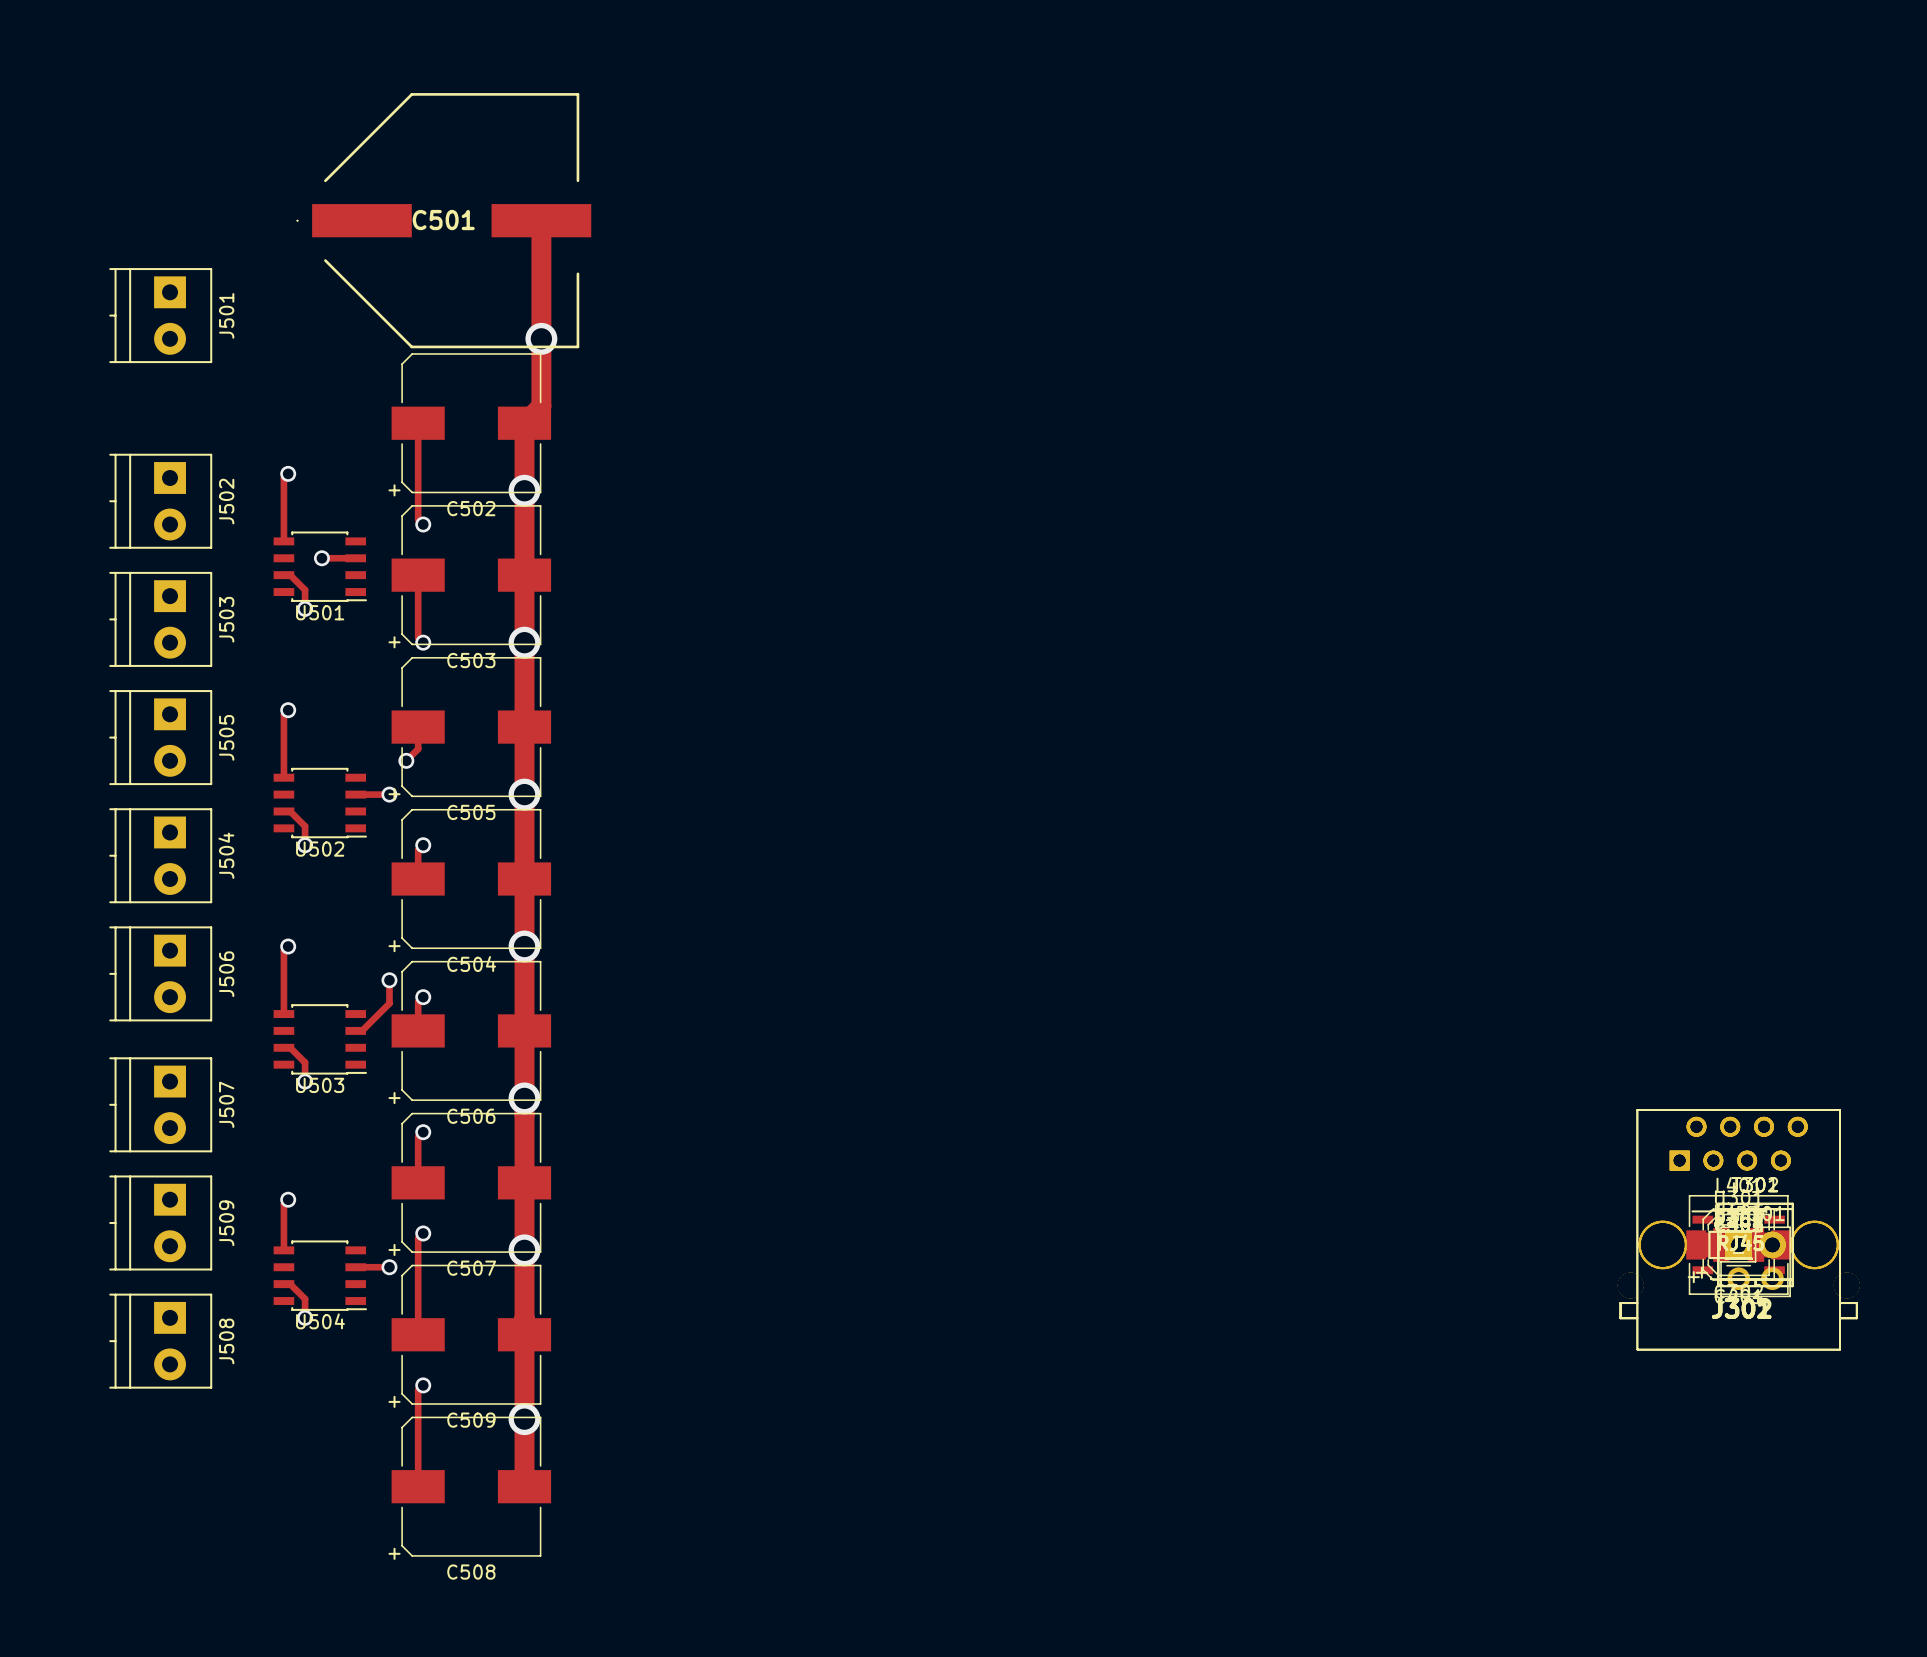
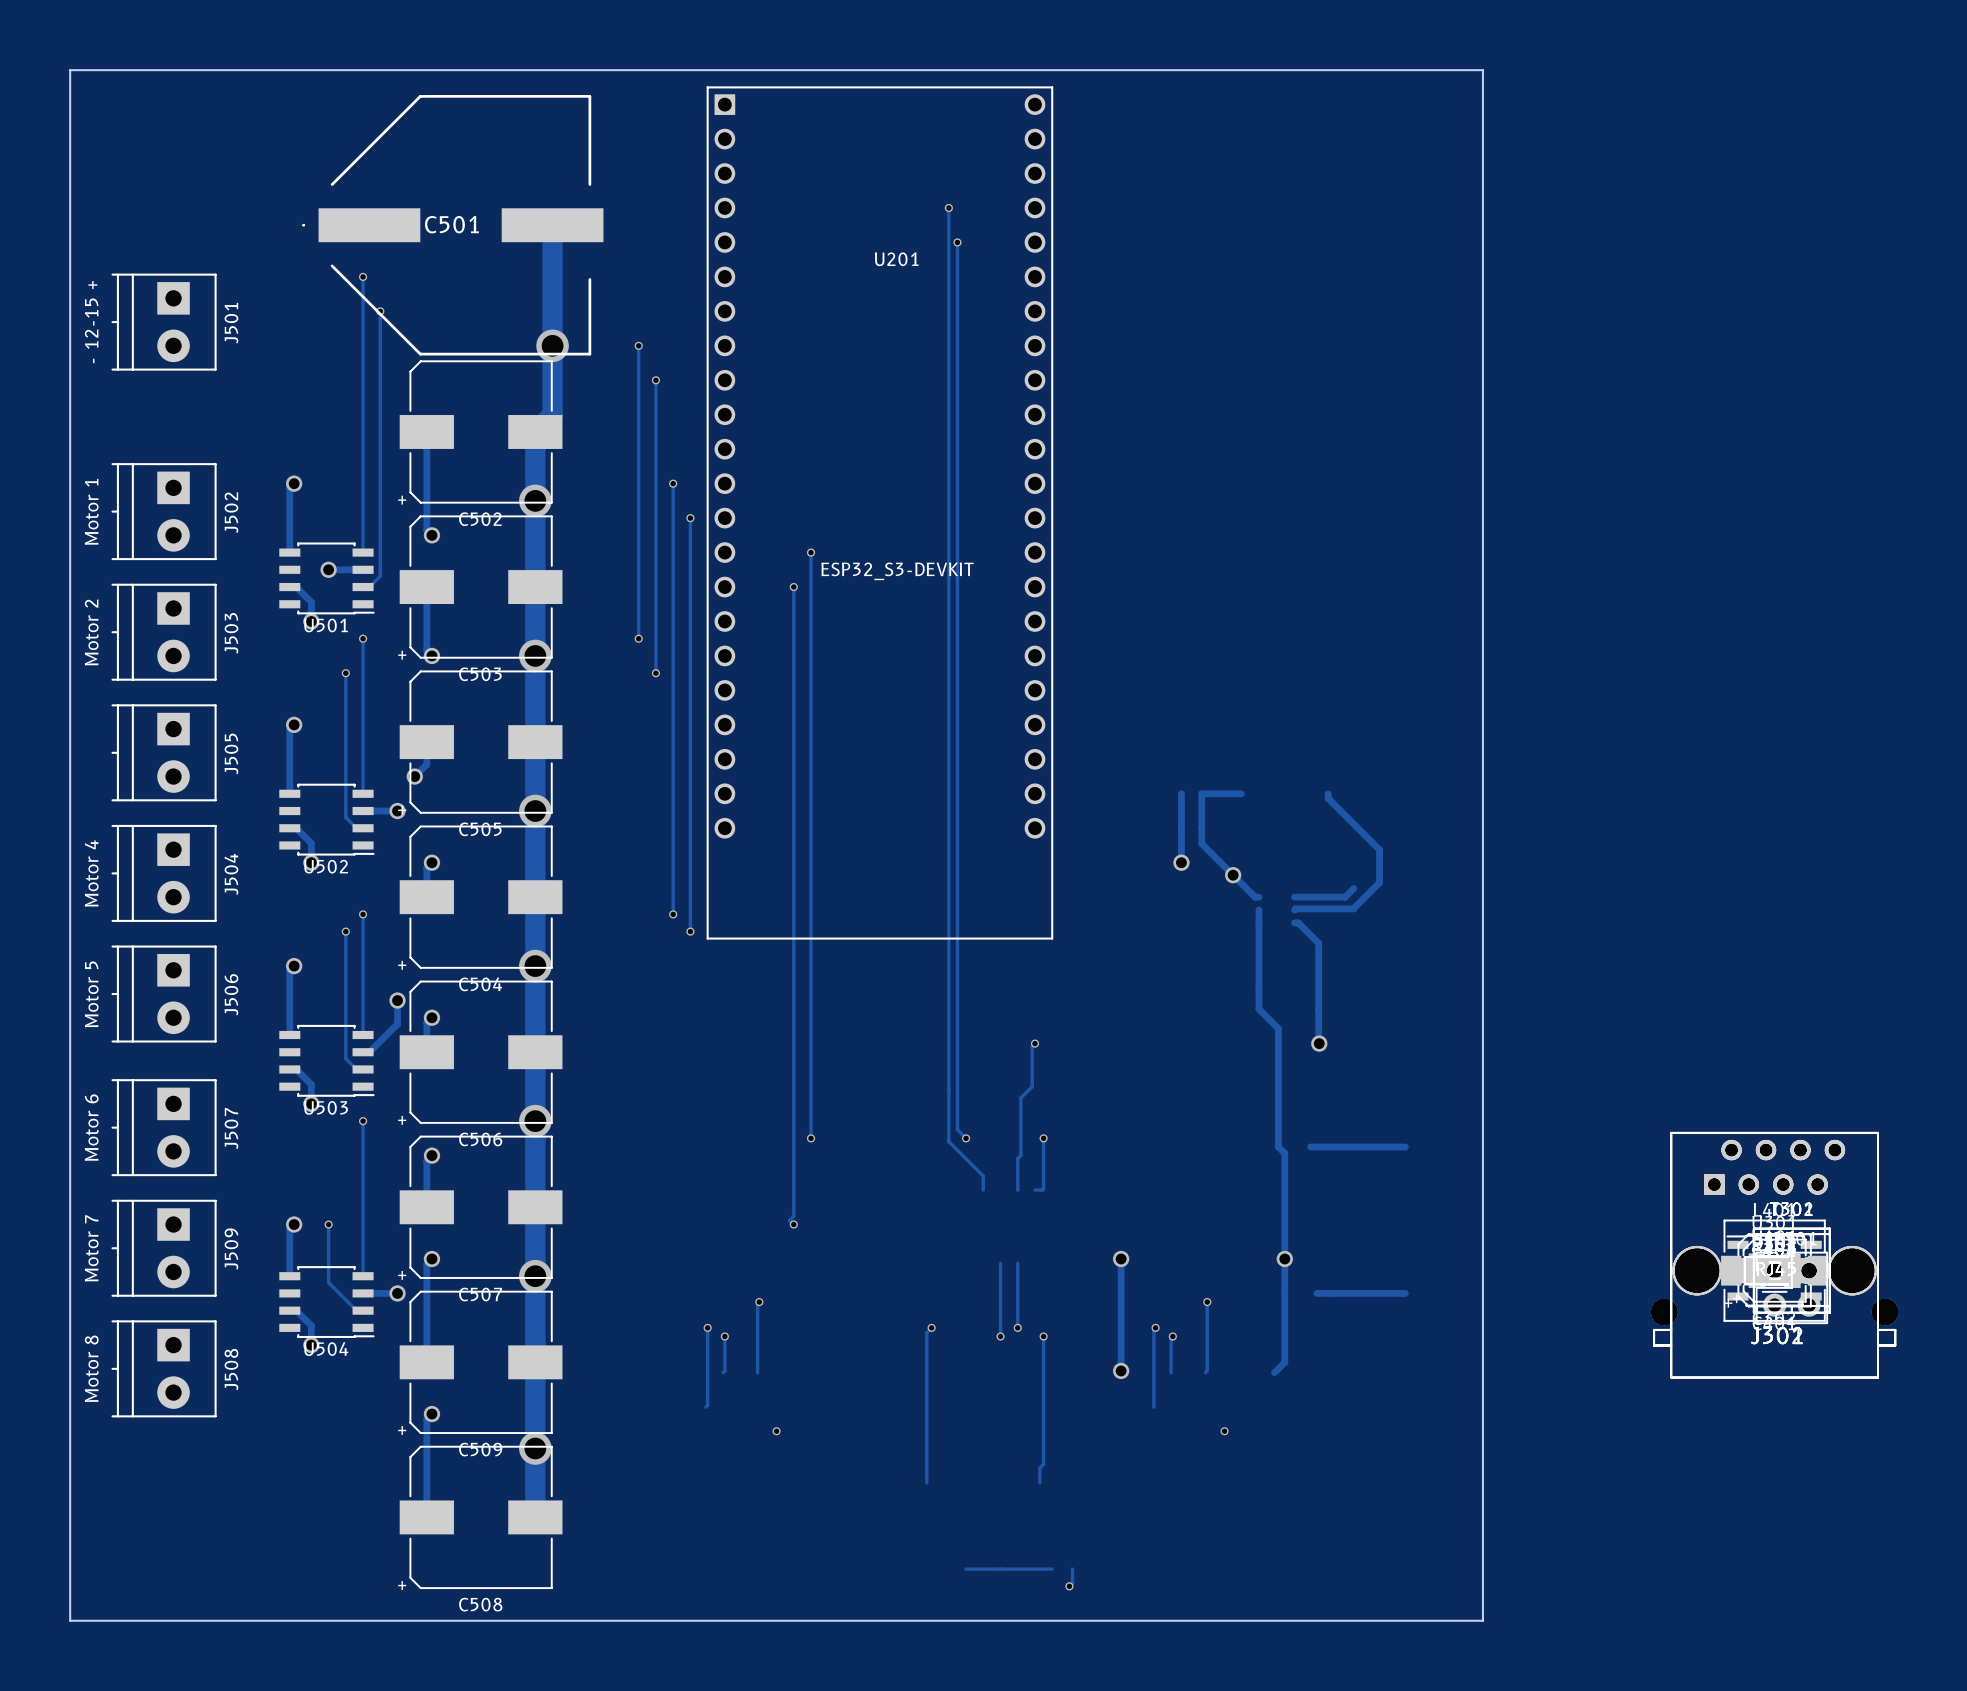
board edge: none -> (70, 70) (70, 1620) (1482, 1620) (1482, 70) (70, 70)
track: none -> (948, 208) (948, 1141) (983, 1176) (983, 1190)
via: none -> (948, 208)
track: none -> (957, 242) (957, 1129) (966, 1138)
via: none -> (957, 242)
track: none -> (363, 276) (363, 552)
via: none -> (363, 276)
track: none -> (380, 311) (380, 576) (369, 587) (363, 587)
via: none -> (380, 311)
J501 value: none -> - 12-15 + (91, 322)
track: none -> (638, 345) (638, 638)
via: none -> (638, 345)
track: none -> (655, 380) (655, 673)
via: none -> (655, 380)
track: none -> (673, 483) (673, 914)
via: none -> (673, 483)
J502 value: none -> Motor 1 (91, 511)
U201: none -> ESP32_S3-DEVKIT (879, 512)
track: none -> (690, 518) (690, 931)
via: none -> (690, 518)
track: none -> (811, 552) (811, 1138)
via: none -> (811, 552)
track: none -> (793, 587) (793, 1216) (789, 1220) (793, 1224)
via: none -> (793, 587)
J503 value: none -> Motor 2 (91, 632)
track: none -> (363, 638) (363, 793)
via: none -> (363, 638)
via: none -> (638, 638)
track: none -> (345, 673) (345, 817) (356, 828) (363, 828)
via: none -> (345, 673)
via: none -> (655, 673)
track: none -> (1181, 793) (1181, 862)
track: none -> (1241, 793) (1201, 793) (1201, 843) (1255, 897) (1258, 897)
track: none -> (1328, 793) (1328, 798) (1379, 849) (1379, 882) (1353, 908) (1294, 910)
via: none -> (1181, 862)
J504 value: none -> Motor 4 (91, 873)
via: none -> (1233, 875)
track: none -> (1353, 888) (1345, 897) (1294, 897)
track: none -> (1258, 910) (1258, 1009) (1278, 1028) (1278, 1146) (1284, 1153) (1284, 1362) (1274, 1372)
track: none -> (363, 914) (363, 1035)
via: none -> (363, 914)
via: none -> (673, 914)
track: none -> (1294, 922) (1298, 922) (1318, 943) (1319, 1043)
track: none -> (345, 931) (345, 1058) (356, 1069) (363, 1069)
via: none -> (345, 931)
via: none -> (690, 931)
J506 value: none -> Motor 5 (91, 994)
track: none -> (1035, 1043) (1032, 1046) (1032, 1086) (1020, 1097) (1020, 1155) (1017, 1158) (1017, 1190)
via: none -> (1035, 1043)
via: none -> (1319, 1043)
track: none -> (363, 1121) (363, 1276)
via: none -> (363, 1121)
J507 value: none -> Motor 6 (91, 1127)
via: none -> (811, 1138)
via: none -> (966, 1138)
track: none -> (1043, 1138) (1043, 1188) (1035, 1190)
via: none -> (1043, 1138)
track: none -> (1310, 1146) (1405, 1146)
track: none -> (328, 1224) (328, 1282) (356, 1310) (363, 1310)
via: none -> (328, 1224)
via: none -> (793, 1224)
J509 value: none -> Motor 7 (91, 1248)
track: none -> (1121, 1258) (1121, 1370)
via: none -> (1121, 1258)
via: none -> (1284, 1258)
track: none -> (1000, 1263) (1000, 1336)
track: none -> (1017, 1263) (1017, 1327)
track: none -> (1317, 1293) (1405, 1293)
track: none -> (759, 1302) (757, 1303) (757, 1372)
via: none -> (759, 1302)
track: none -> (1207, 1302) (1207, 1370) (1205, 1372)
via: none -> (1207, 1302)
track: none -> (707, 1327) (707, 1405) (705, 1407)
via: none -> (707, 1327)
track: none -> (931, 1327) (926, 1332) (926, 1482)
via: none -> (931, 1327)
via: none -> (1017, 1327)
track: none -> (1155, 1327) (1153, 1329) (1153, 1407)
via: none -> (1155, 1327)
track: none -> (724, 1336) (724, 1370) (723, 1372)
via: none -> (724, 1336)
via: none -> (1000, 1336)
track: none -> (1043, 1336) (1043, 1464) (1039, 1468) (1039, 1482)
via: none -> (1043, 1336)
track: none -> (1172, 1336) (1171, 1338) (1171, 1372)
via: none -> (1172, 1336)
J508 value: none -> Motor 8 (91, 1368)
via: none -> (1121, 1370)
via: none -> (776, 1431)
via: none -> (1224, 1431)
track: none -> (966, 1569) (1052, 1569)
track: none -> (1072, 1569) (1072, 1583) (1069, 1586)
via: none -> (1069, 1586)

